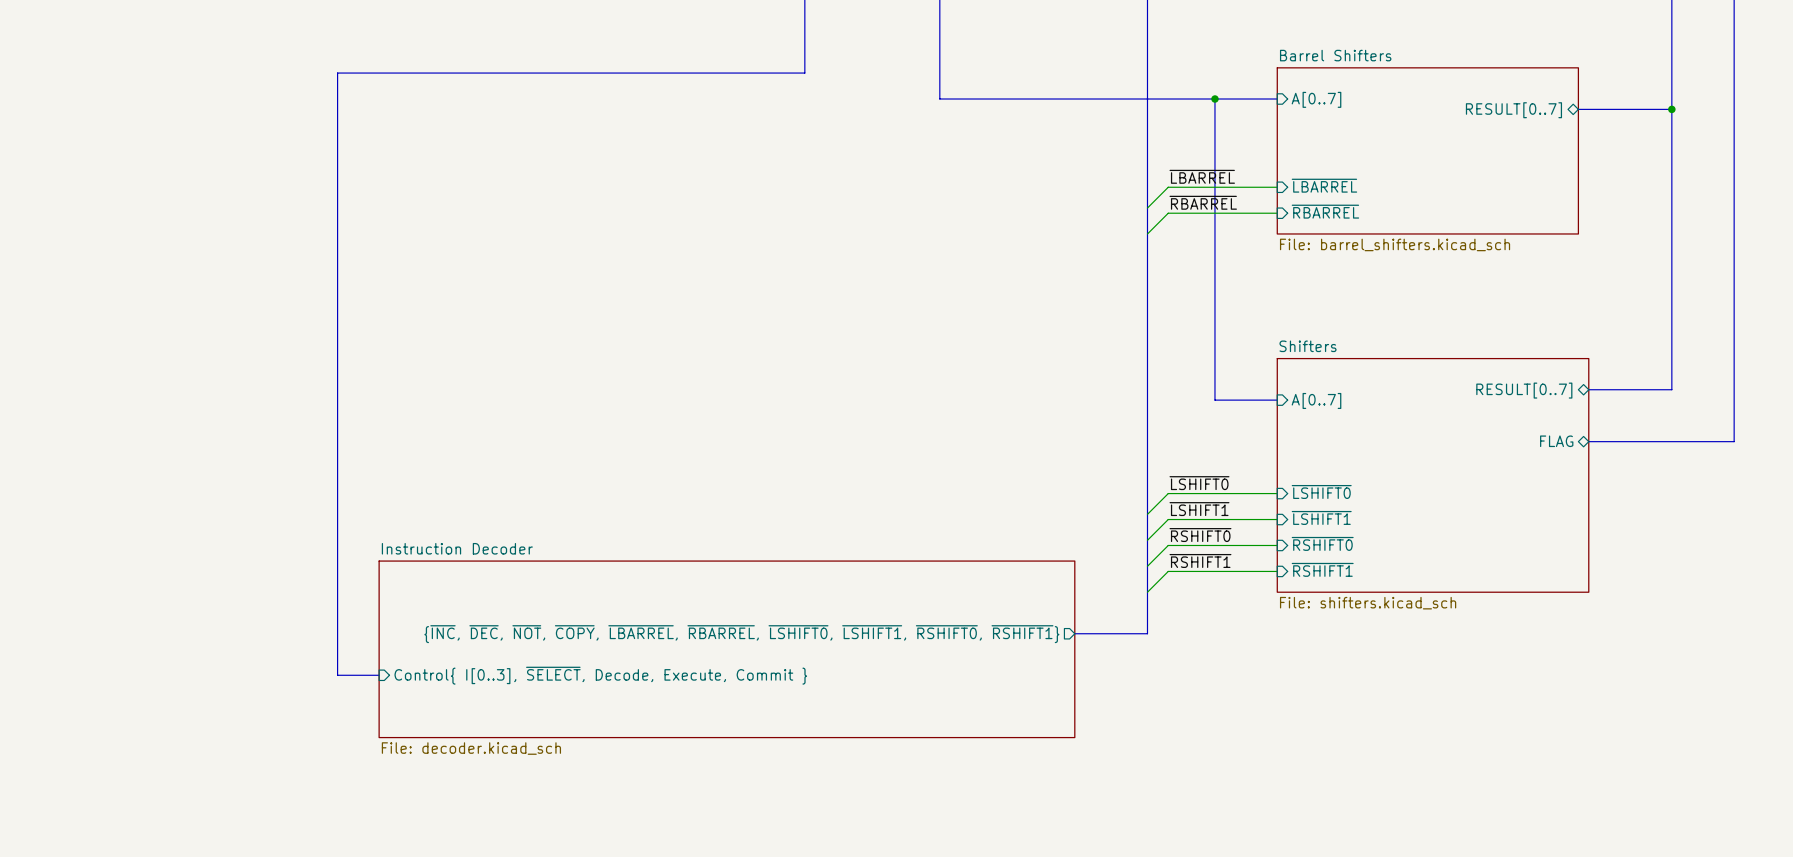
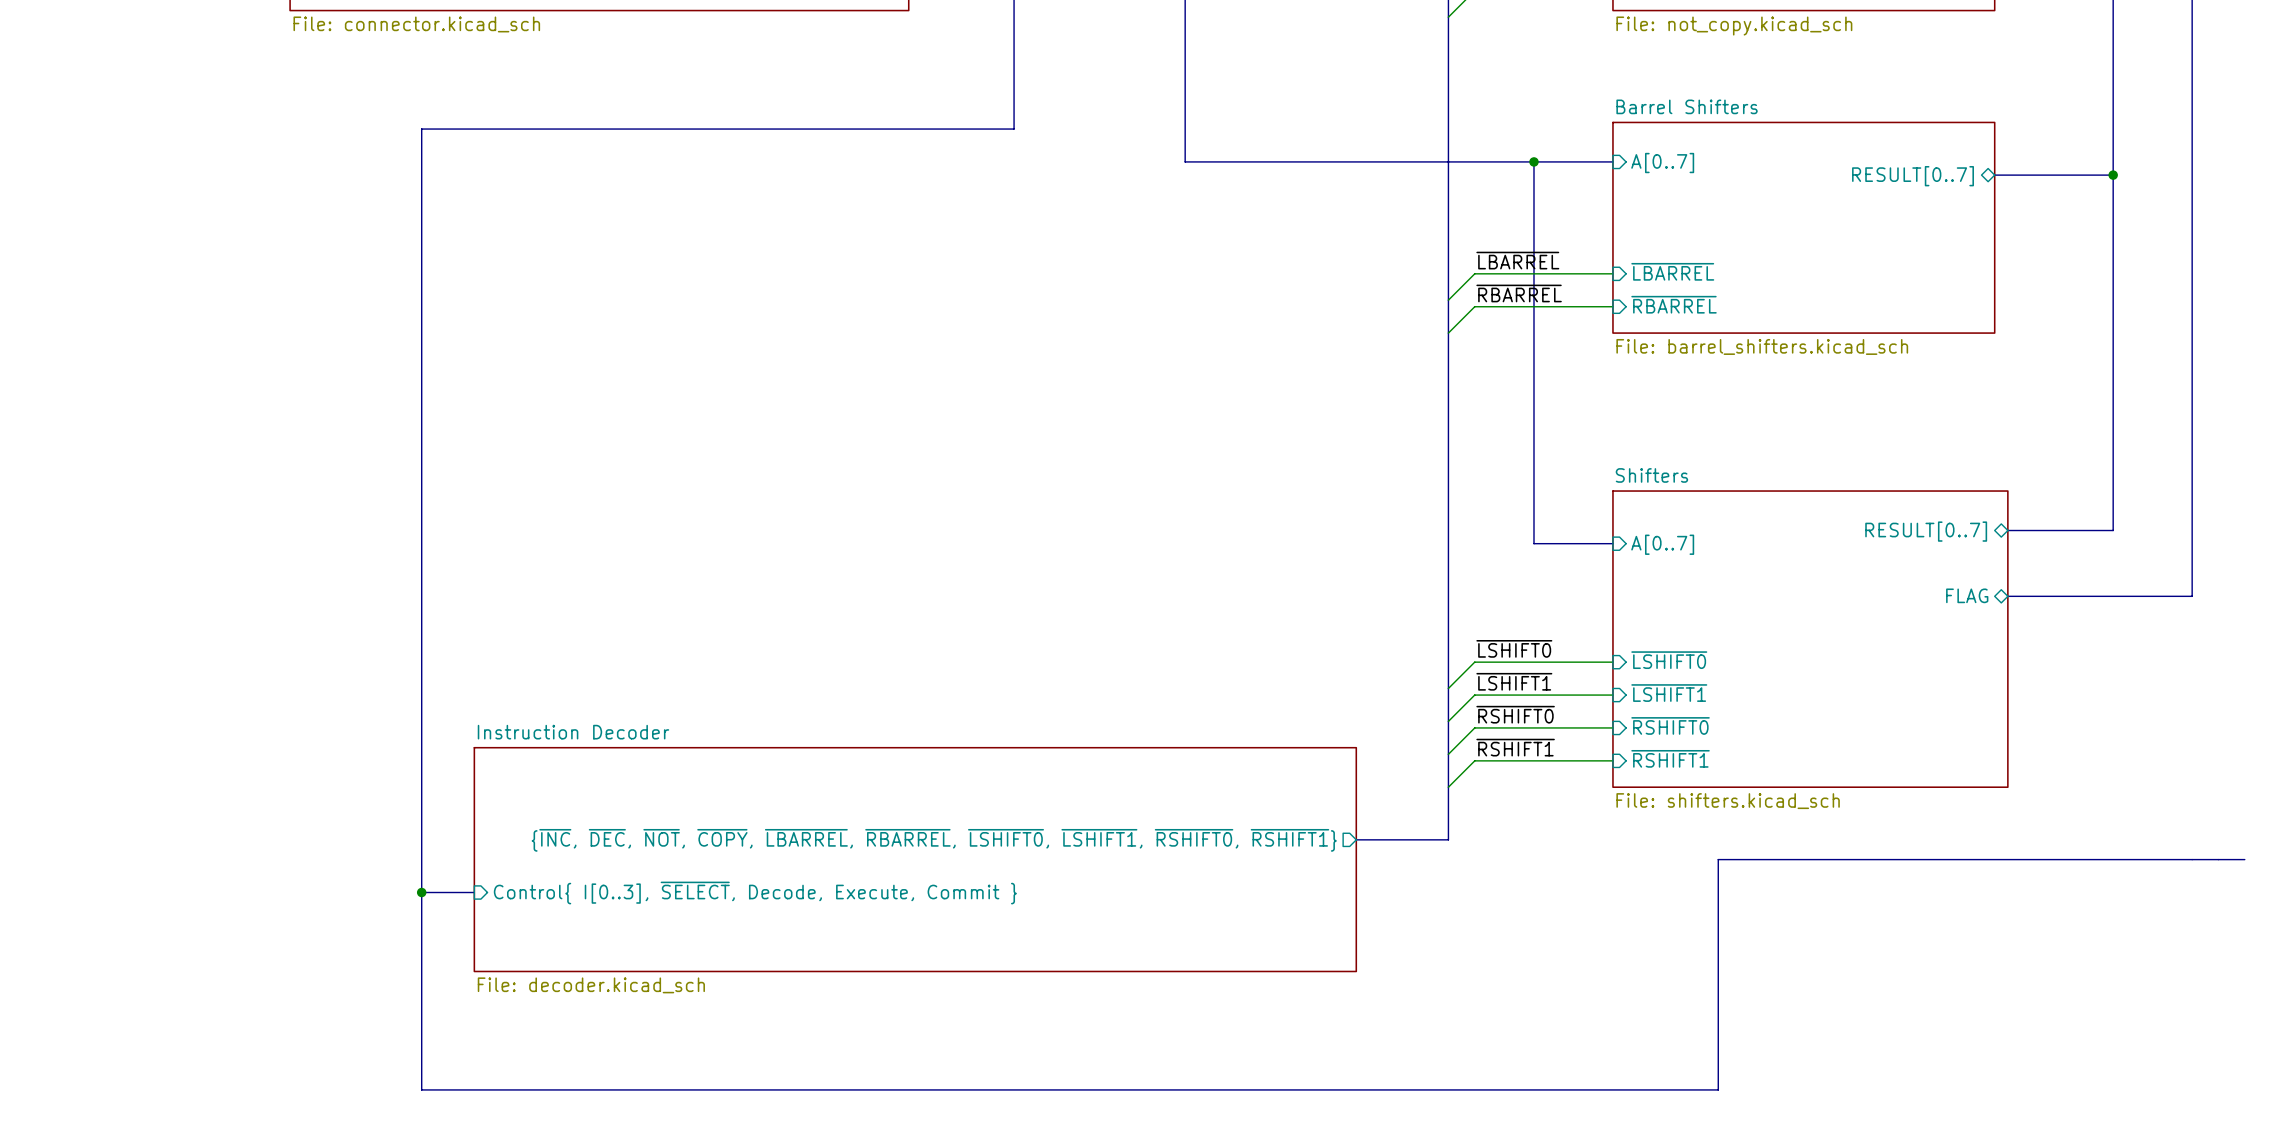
bus: none -> (2244, 859) (1718, 859) (1718, 1089) (421, 1089) (421, 892)
junction: none -> (421, 892)

